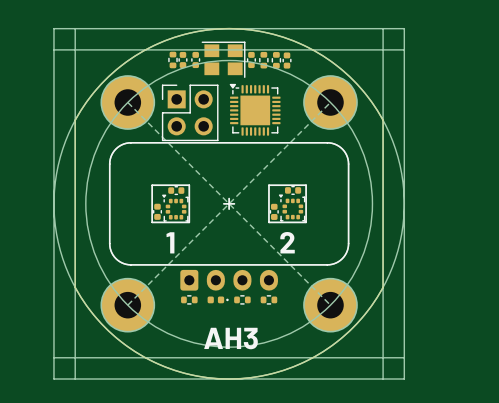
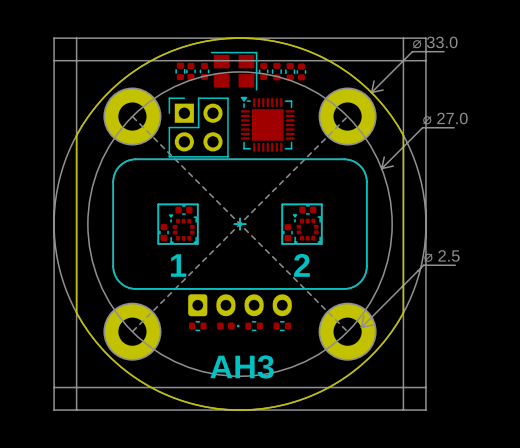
text: none -> ⌀ 33.0 (435, 42)
line: none -> (444, 51) (412, 51) (371, 92)
line: none -> (374, 80) (371, 92)
line: none -> (383, 90) (371, 92)
text: none -> ⌀ 27.0 (445, 118)
line: none -> (454, 127) (422, 127) (381, 168)
line: none -> (384, 157) (381, 168)
line: none -> (393, 166) (381, 168)
text: none -> ⌀ 2.5 (441, 256)
line: none -> (455, 265) (423, 265) (361, 327)
line: none -> (363, 315) (361, 327)
line: none -> (373, 324) (361, 327)

